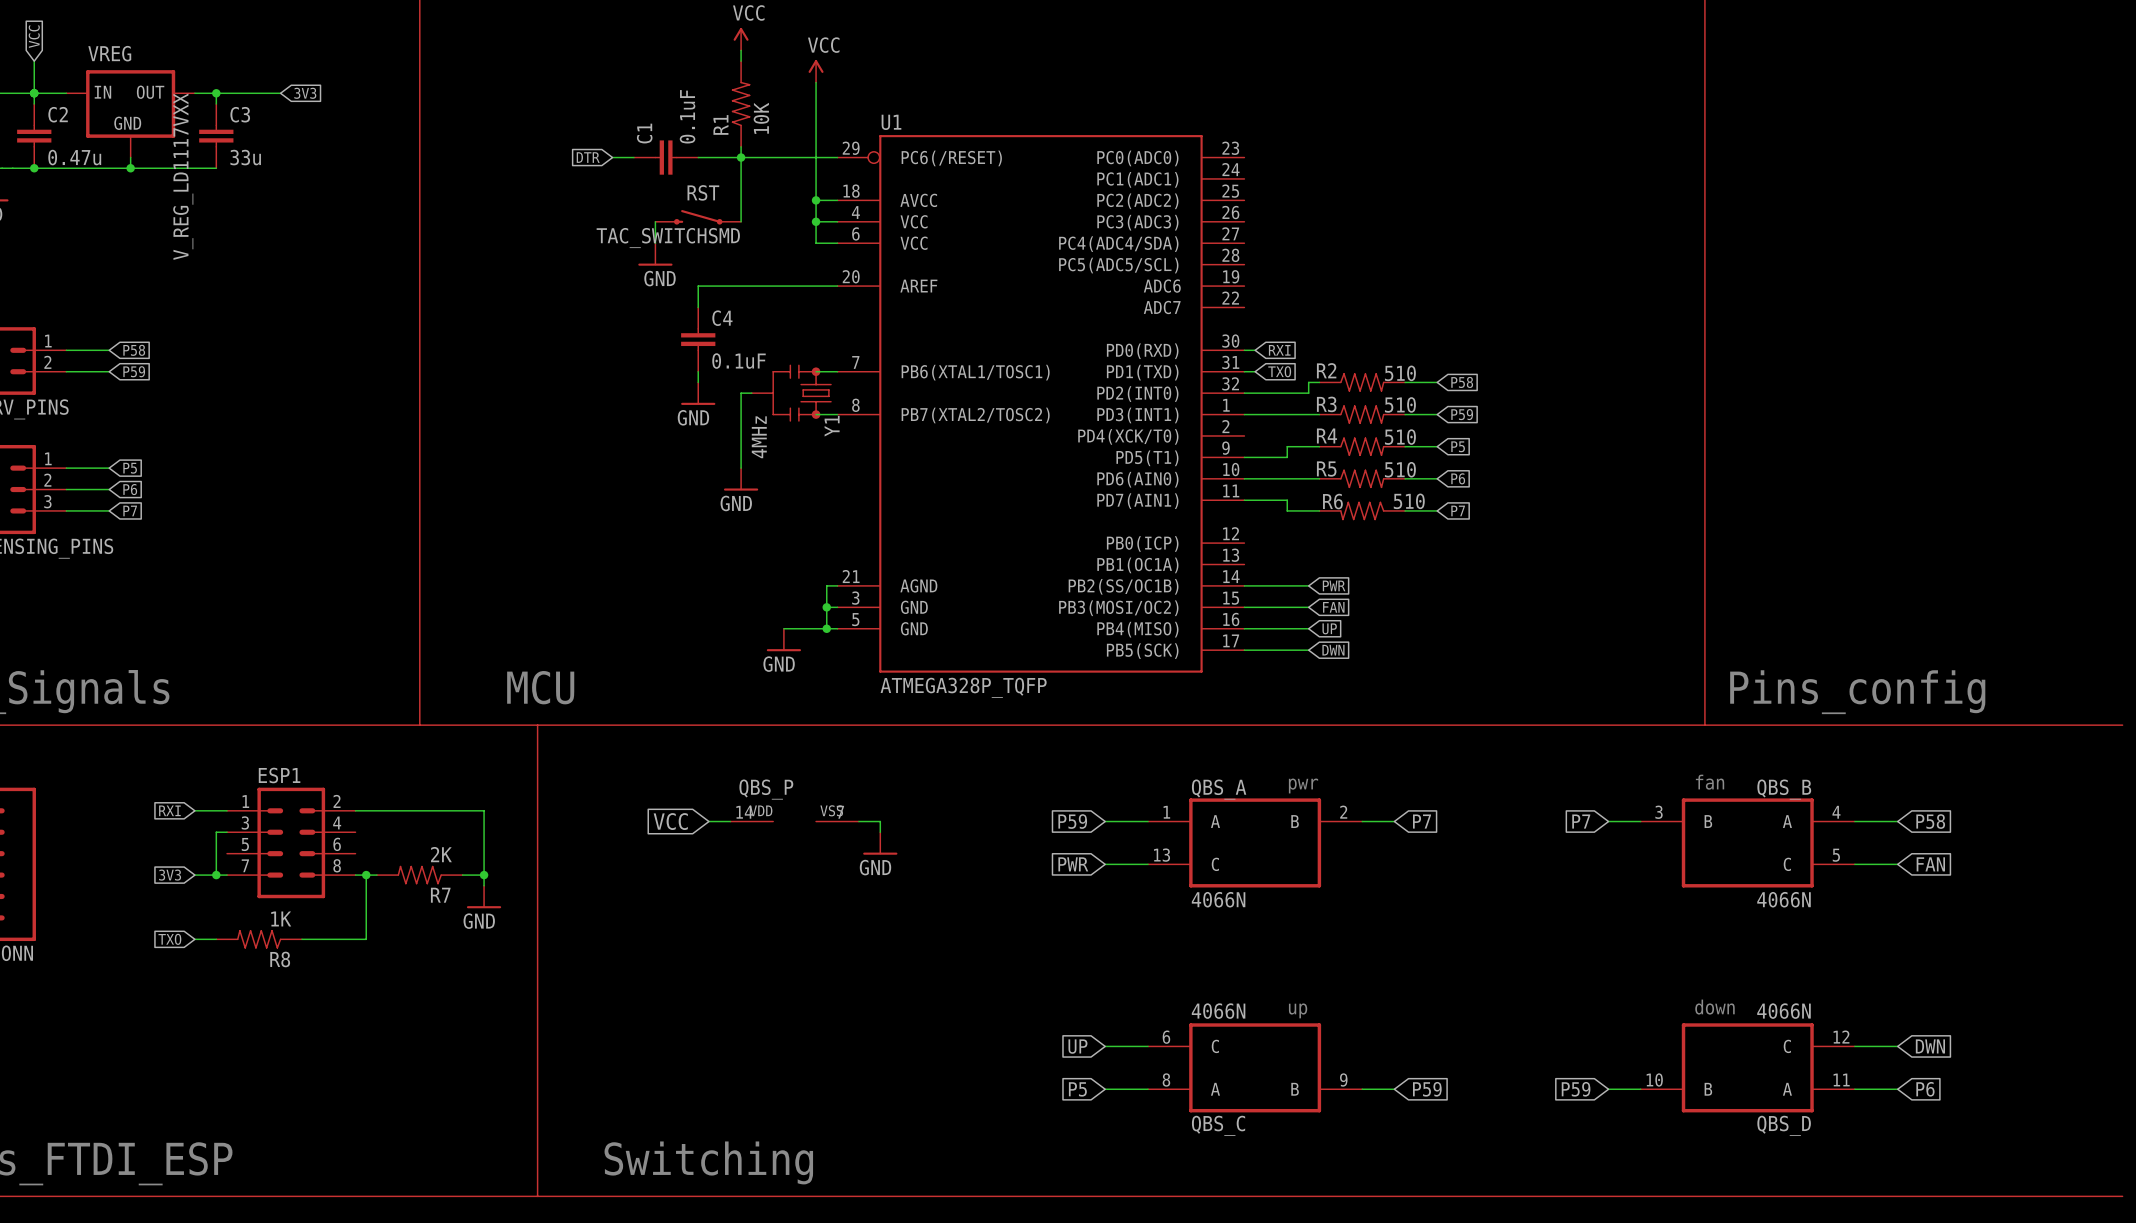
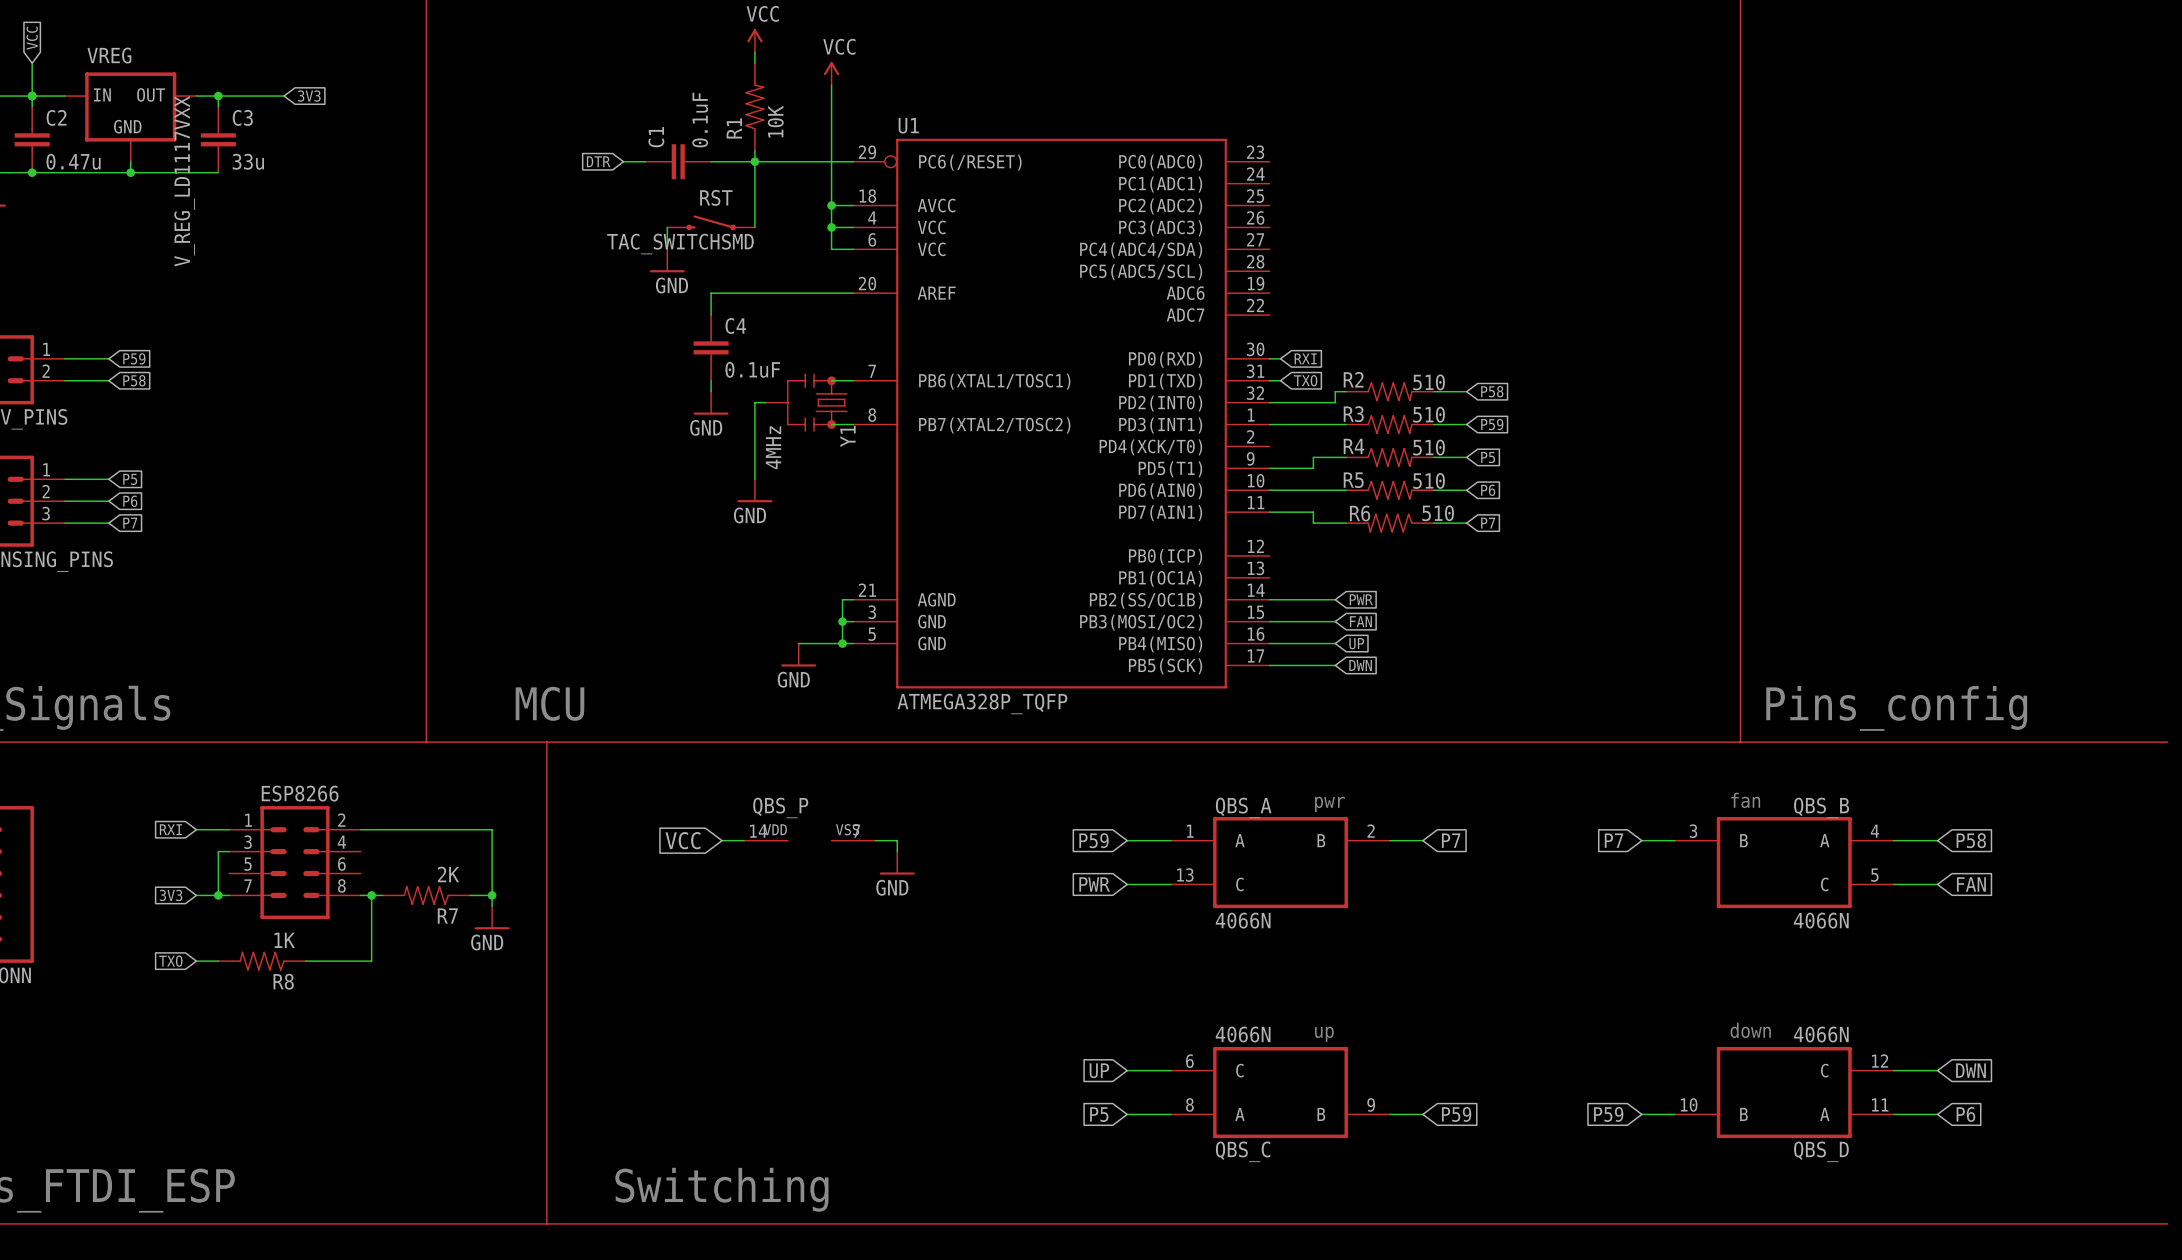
global label: P58 (134, 350) -> P59 (134, 358)
global label: P59 (134, 371) -> P58 (134, 380)
ESP1 name: ESP1 (279, 775) -> ESP8266 (300, 793)

